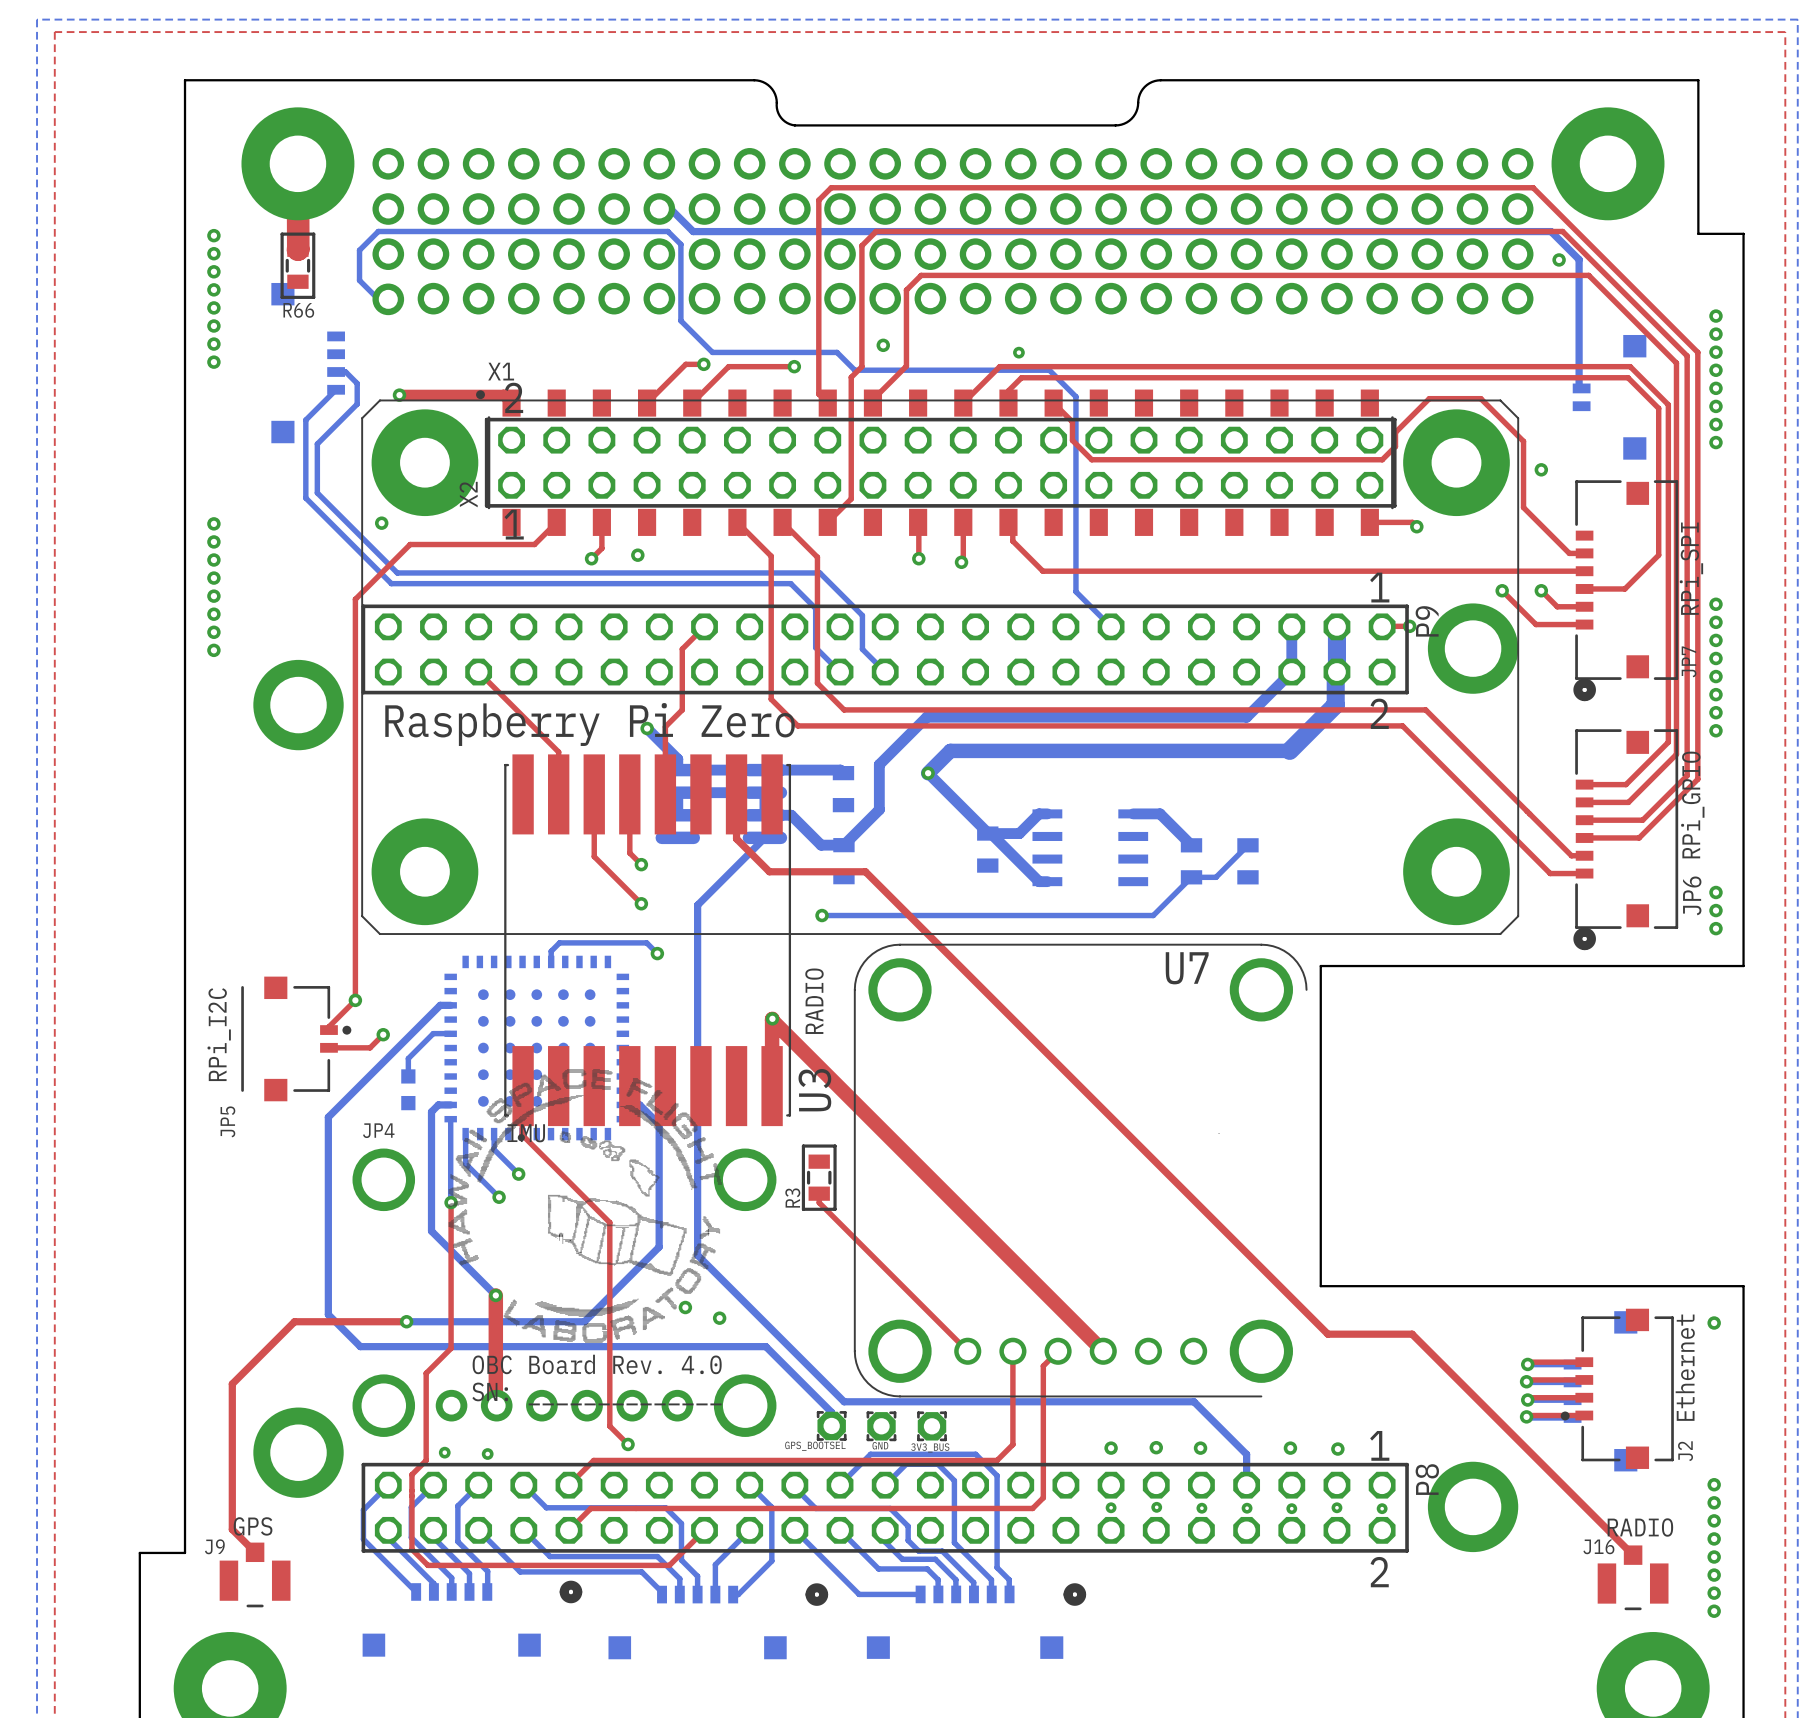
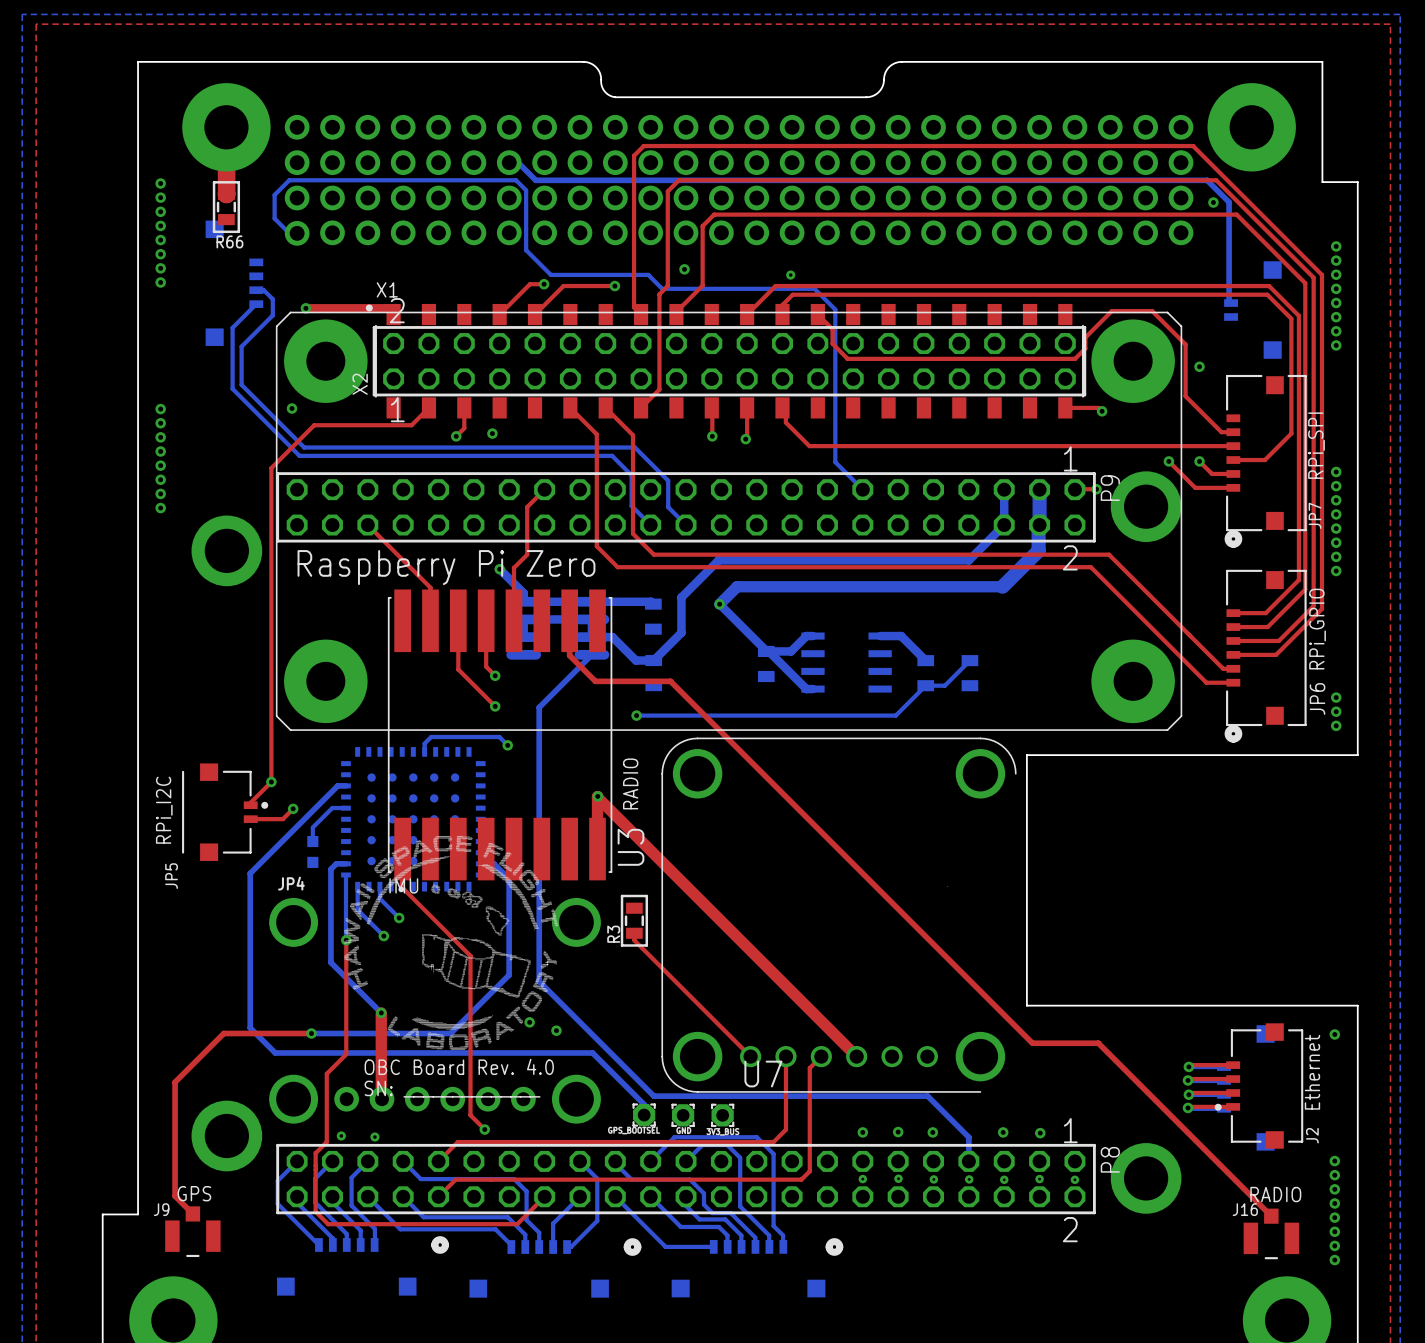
text: U7 (1187, 968) -> none
text: none -> U7 (763, 1074)

